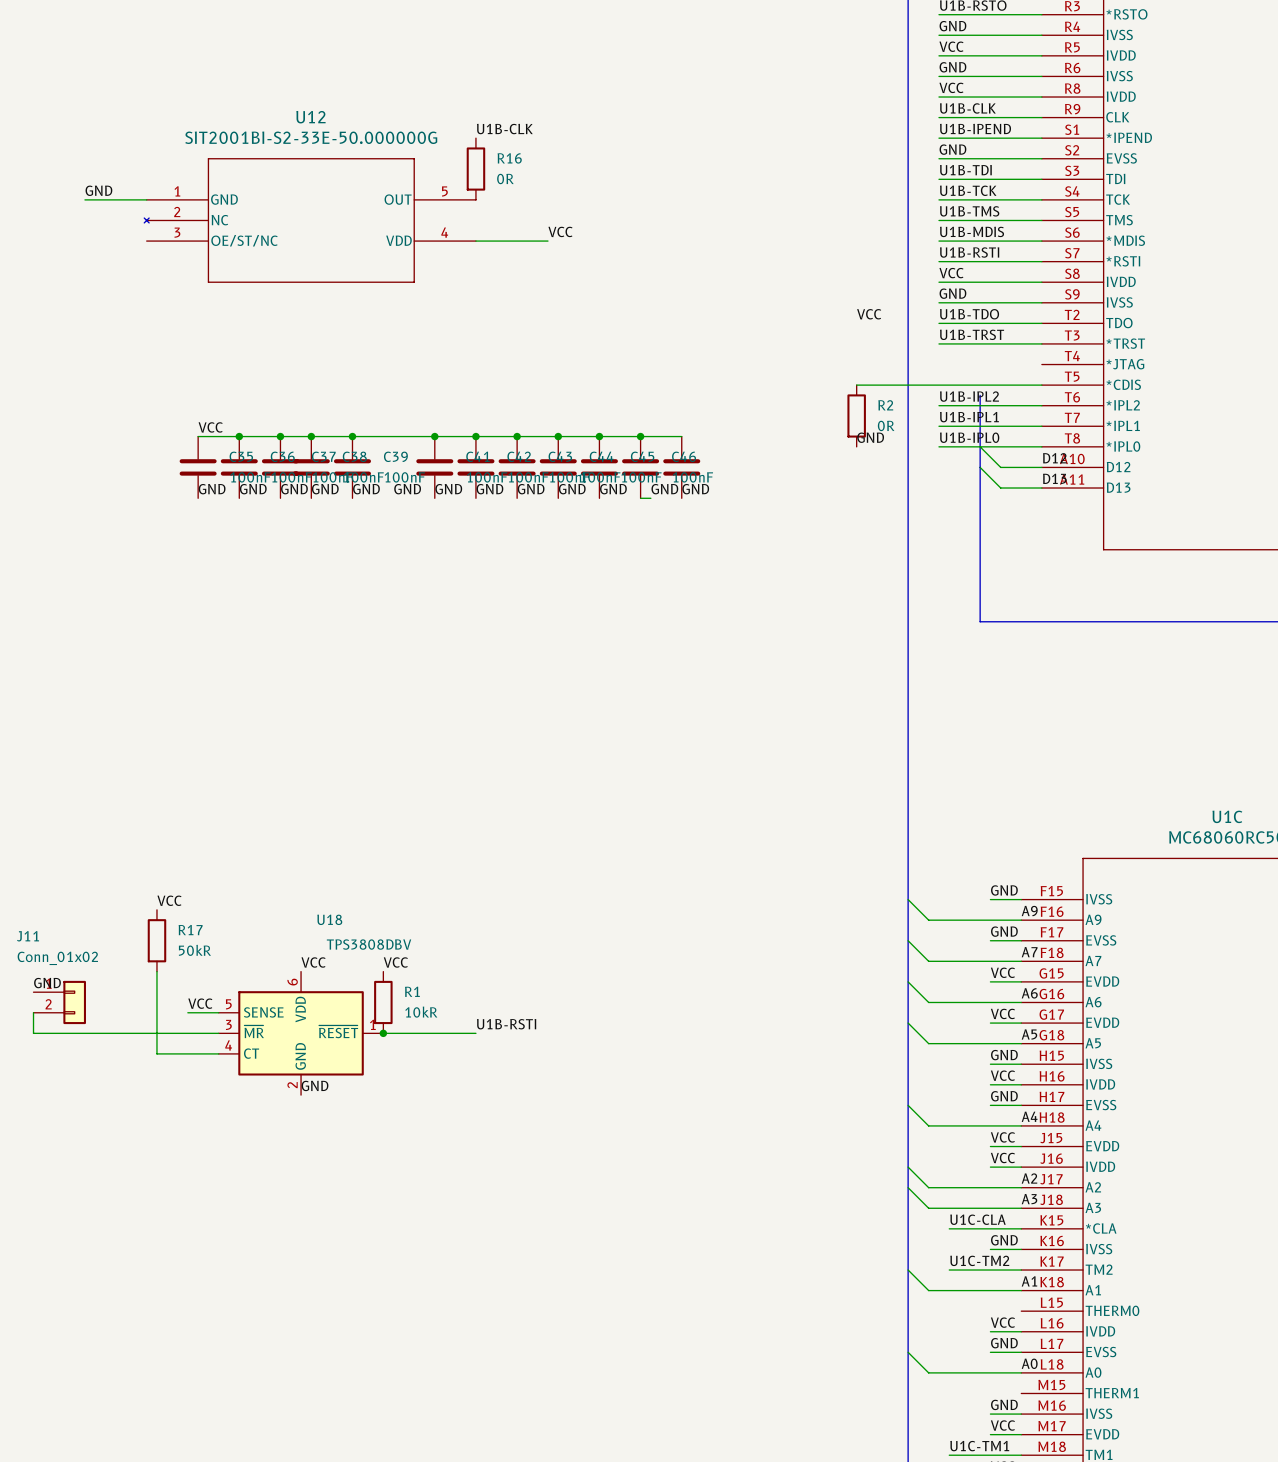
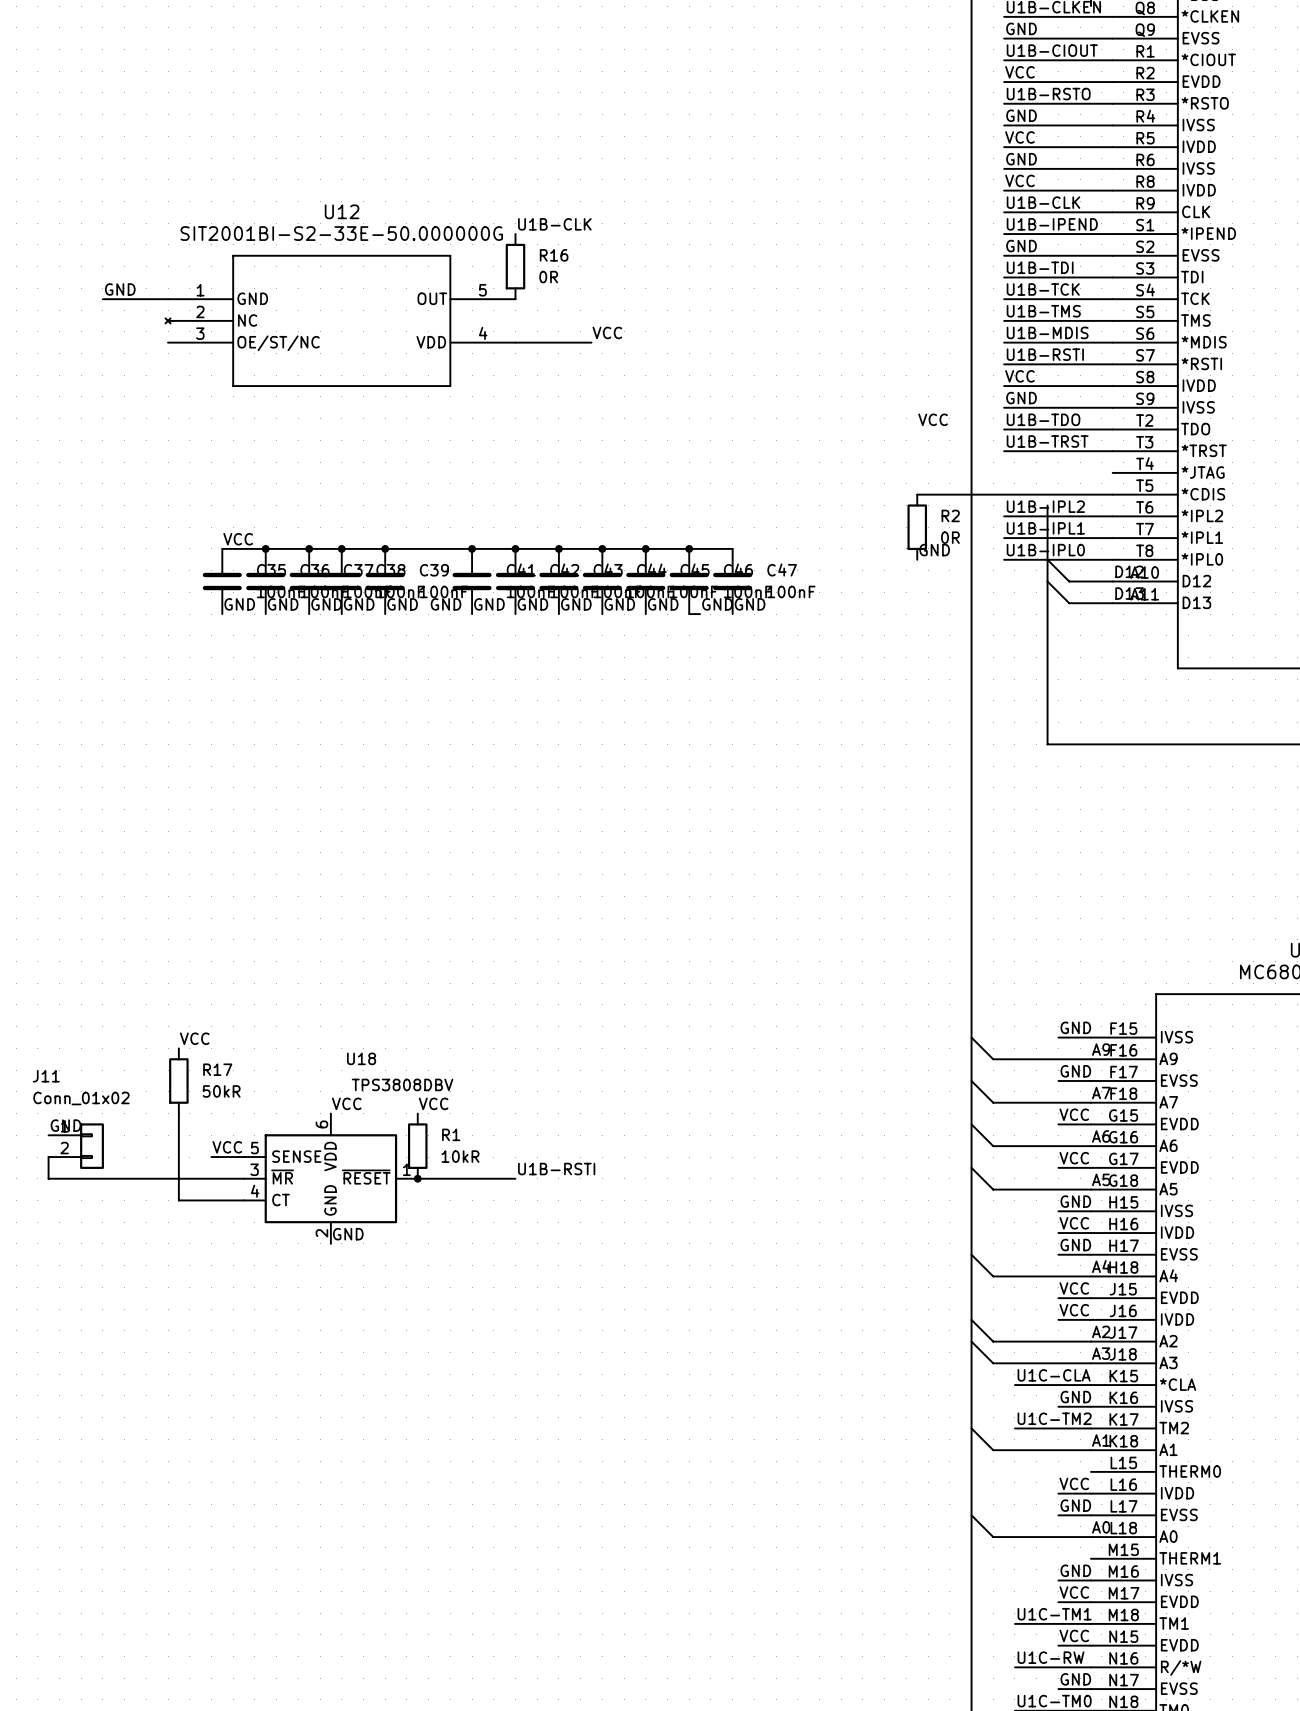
C47 name: none -> C47 (782, 569)
C47 value: none -> 100nF (791, 591)

